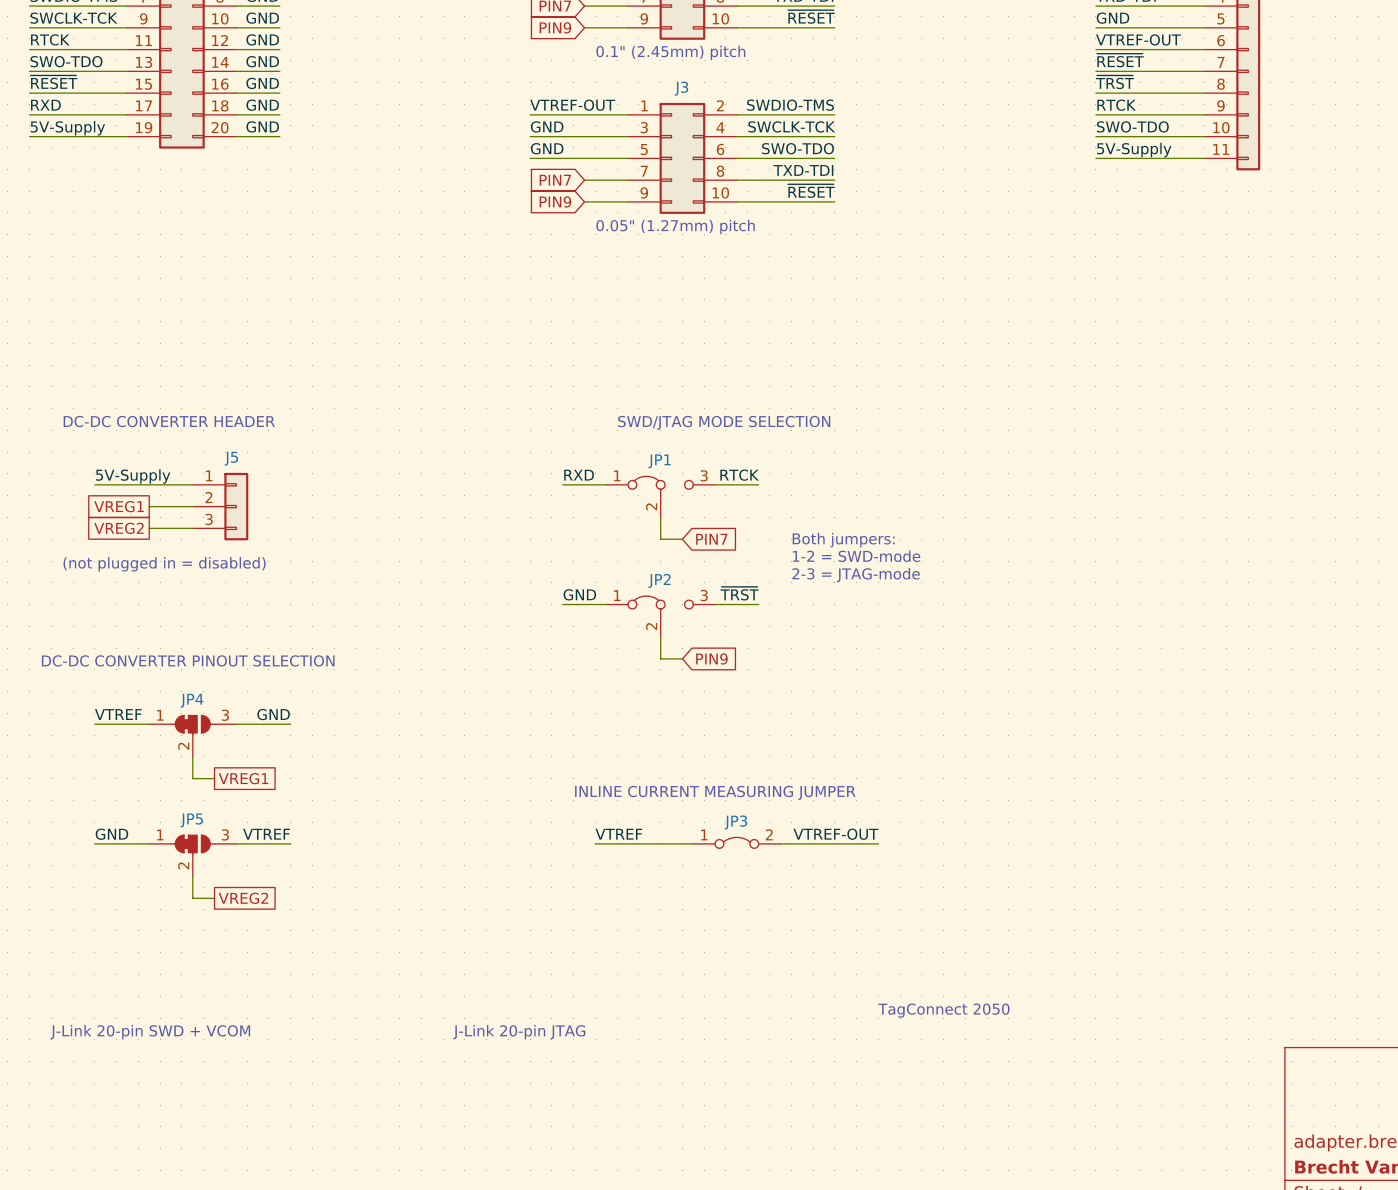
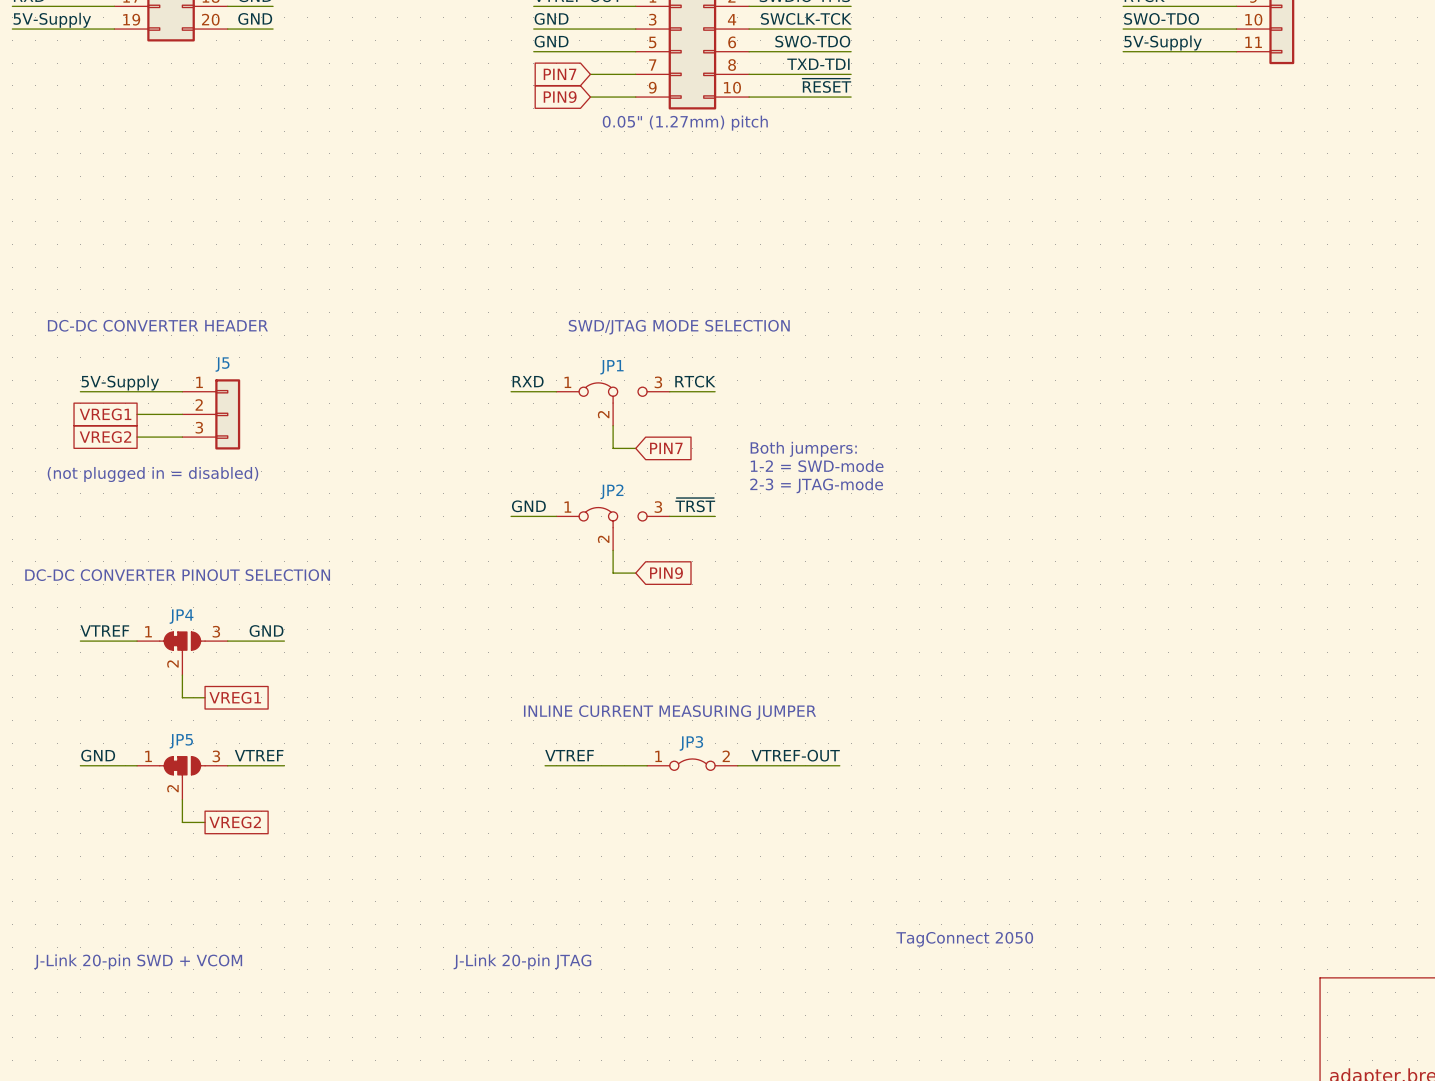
text position: SWD/JTAG MODE SELECTION (724, 422) -> SWD/JTAG MODE SELECTION (679, 327)
label position: RXD (579, 475) -> RXD (528, 381)
label position: RTCK (739, 475) -> RTCK (695, 381)
wire: (562, 484) (606, 484) -> (511, 391) (556, 391)
wire: (715, 484) (758, 484) -> (669, 391) (715, 391)
JP1 position: (660, 496) -> (613, 404)
wire: (660, 517) (660, 539) (682, 539) -> (613, 425) (613, 448) (635, 448)
global label position: PIN7 (711, 539) -> PIN7 (666, 448)
text position: Both jumpers: (843, 540) -> Both jumpers: (803, 449)
text position: 1-2 = SWD-mode (856, 556) -> 1-2 = SWD-mode (817, 466)
text position: 2-3 = JTAG-mode (856, 575) -> 2-3 = JTAG-mode (816, 485)
label position: ~{TRST} (739, 593) -> ~{TRST} (695, 505)
label position: GND (579, 594) -> GND (528, 506)
wire: (562, 604) (606, 604) -> (511, 516) (556, 516)
wire: (715, 604) (758, 604) -> (669, 516) (715, 516)
JP2 position: (660, 616) -> (613, 528)
wire: (660, 637) (660, 658) (682, 658) -> (613, 550) (613, 573) (635, 573)
global label position: PIN9 (711, 658) -> PIN9 (666, 573)
text position: INLINE CURRENT MEASURING JUMPER (715, 792) -> INLINE CURRENT MEASURING JUMPER (670, 712)
label position: VTREF (618, 834) -> VTREF (569, 755)
label position: VTREF-OUT (835, 834) -> VTREF-OUT (795, 755)
JP3 position: (736, 842) -> (692, 764)
wire: (638, 843) (693, 843) -> (545, 765) (601, 765)
wire: (823, 843) (878, 843) -> (737, 765) (794, 765)

